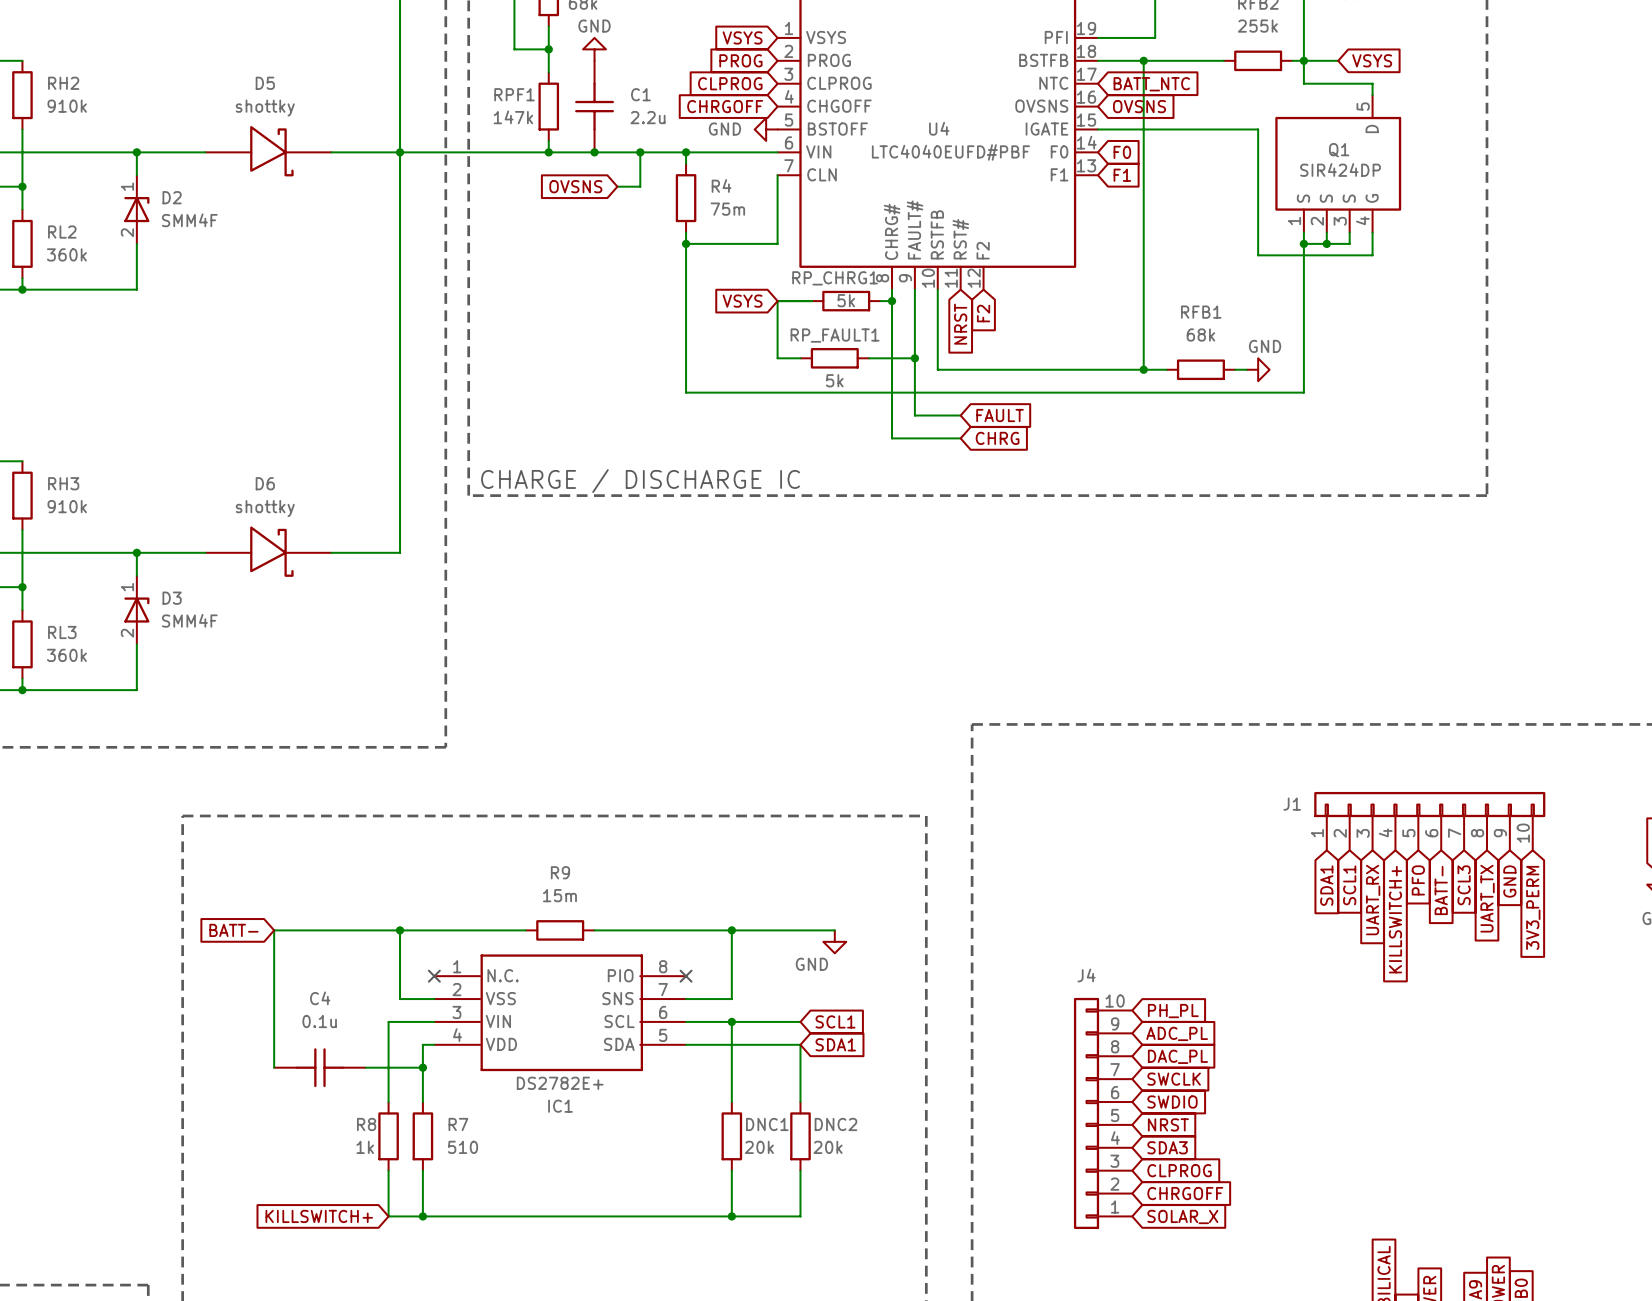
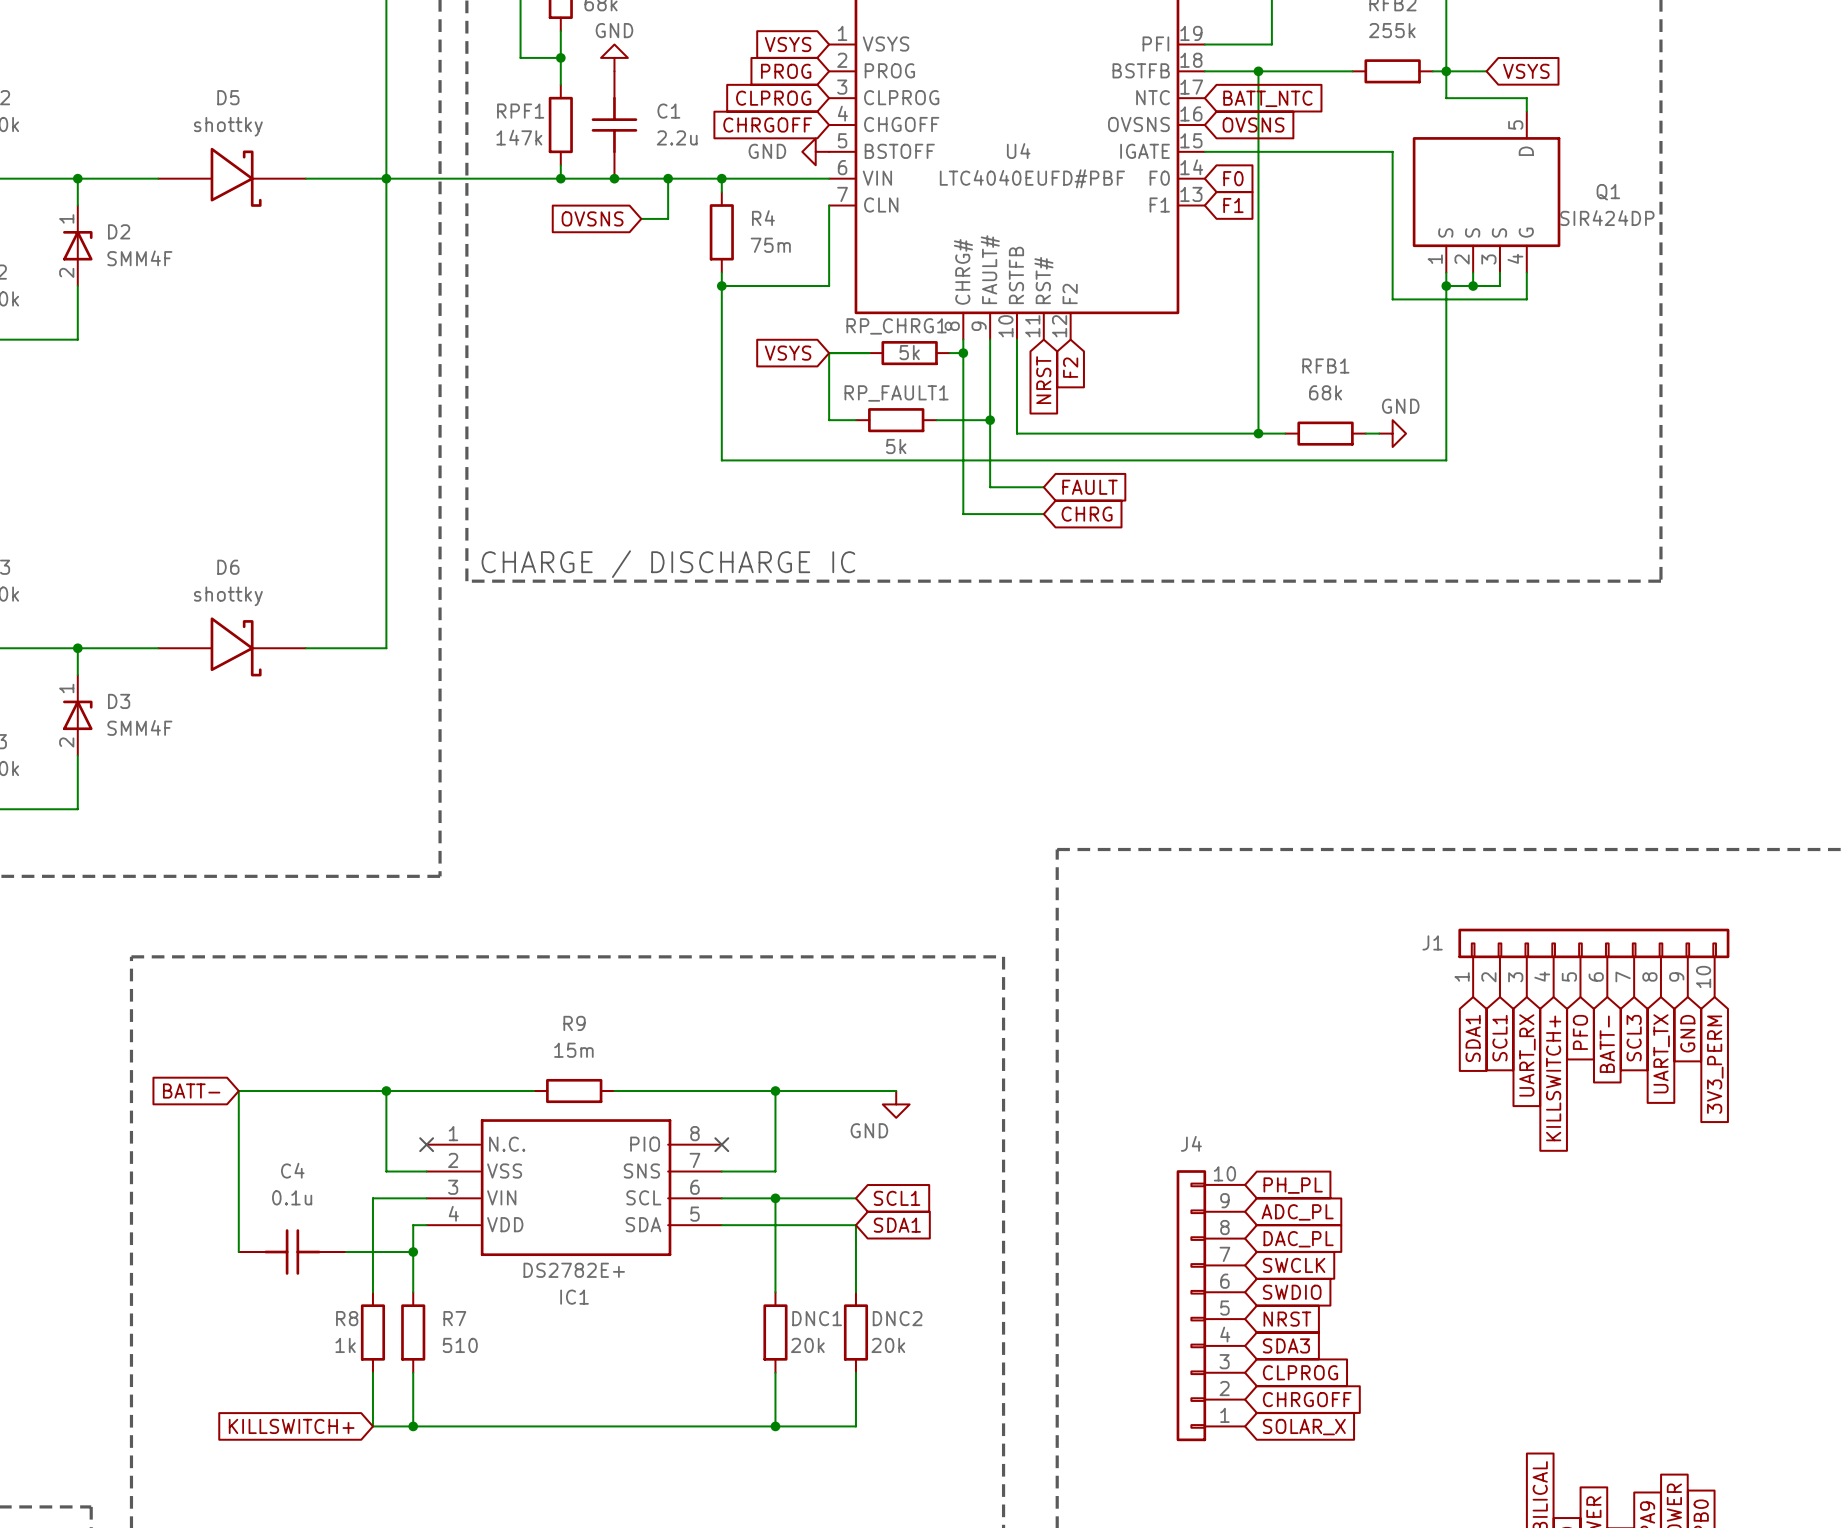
Q1 name position: Q1 (1339, 150) -> Q1 (1608, 192)
Q1 value position: SIR424DP (1340, 169) -> SIR424DP (1607, 218)

